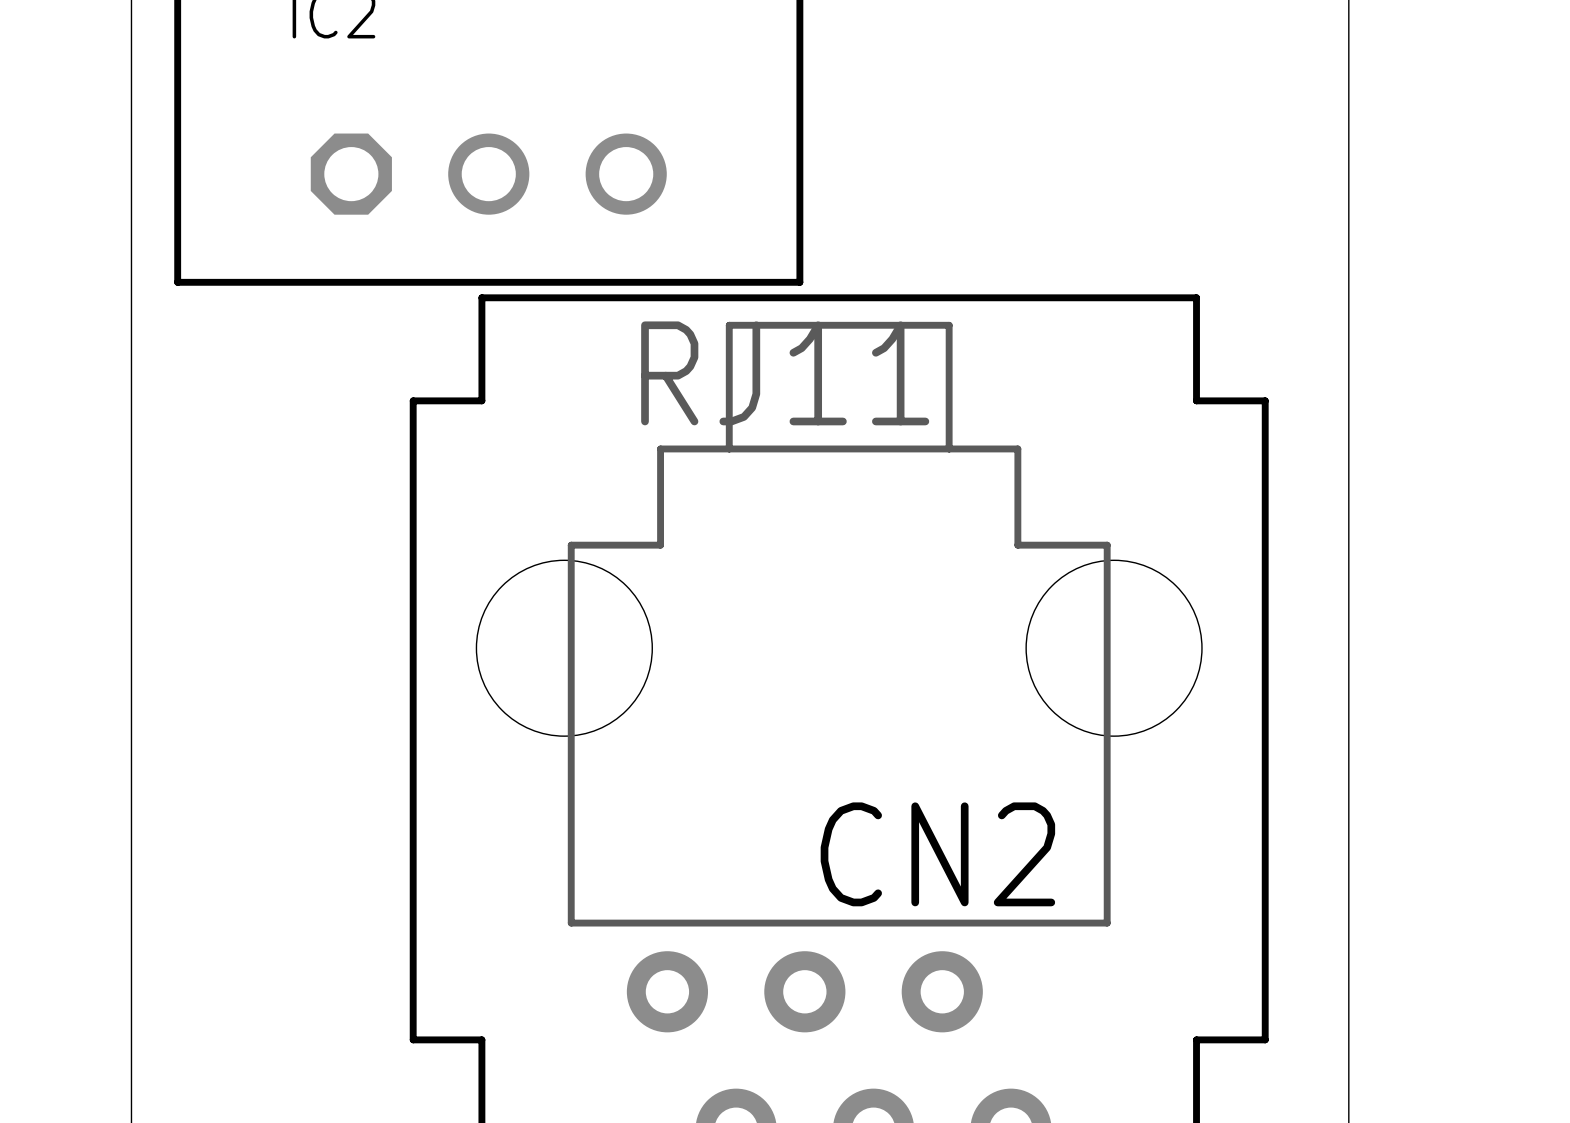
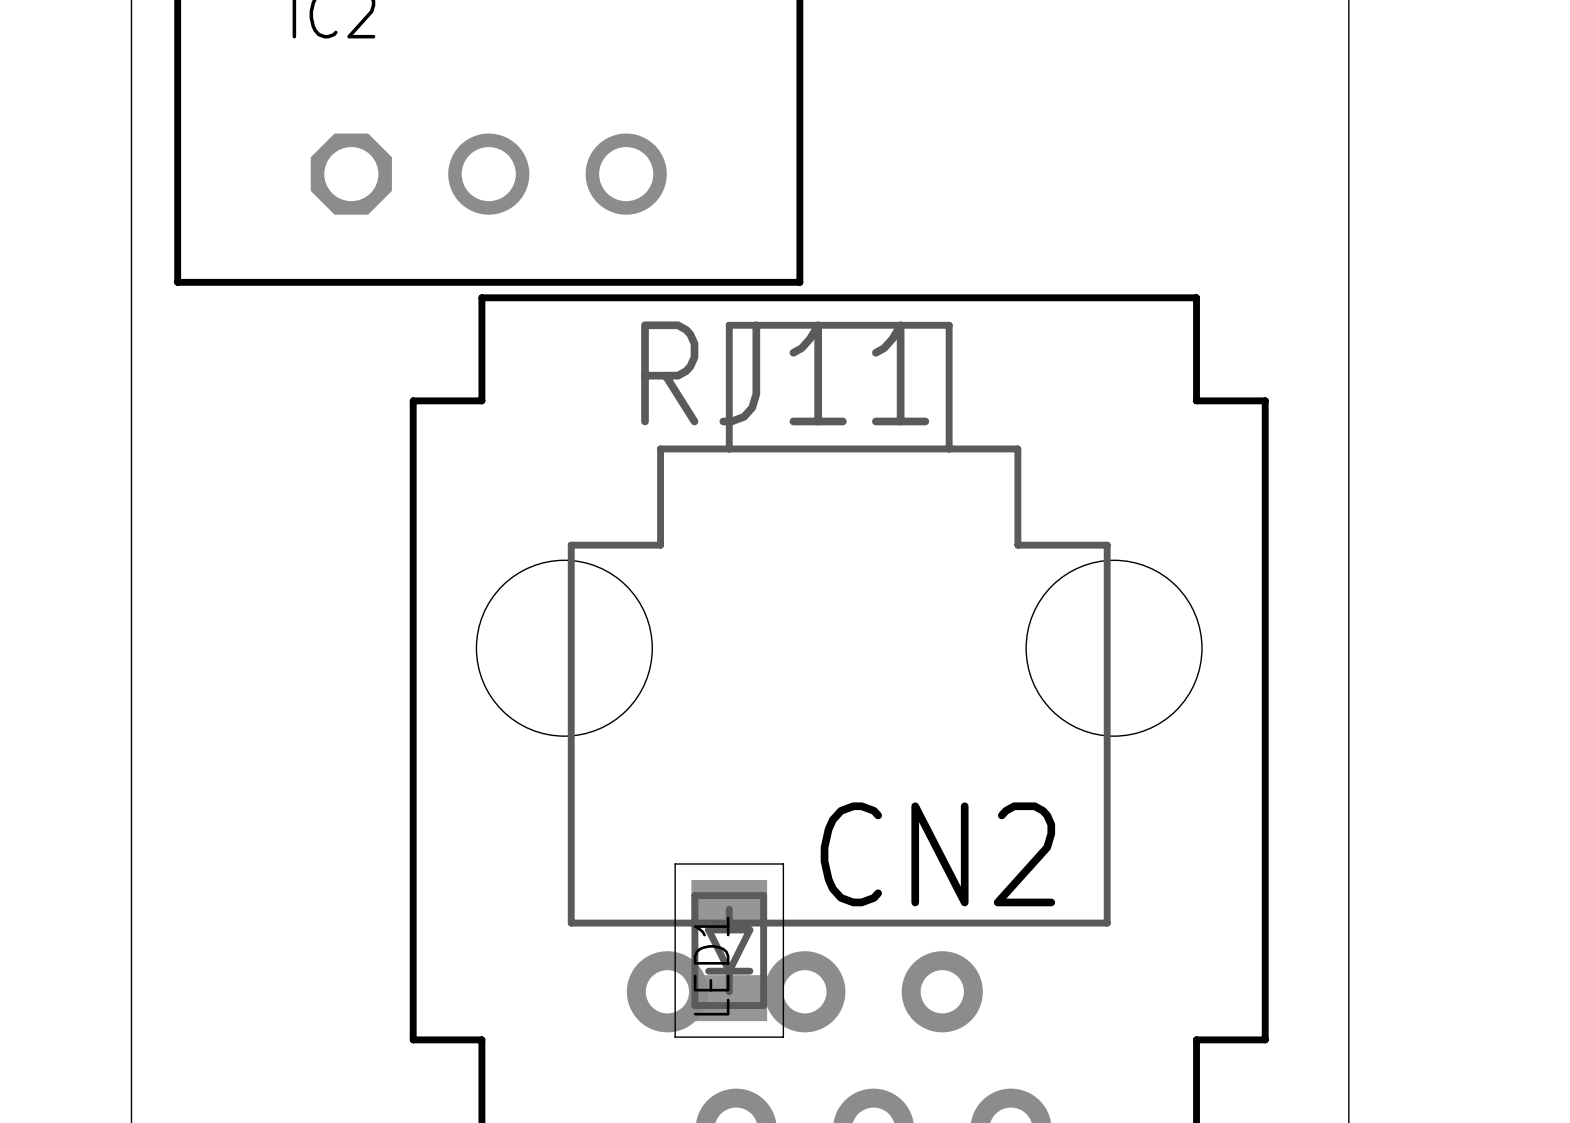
LED1: none -> (729, 950)

